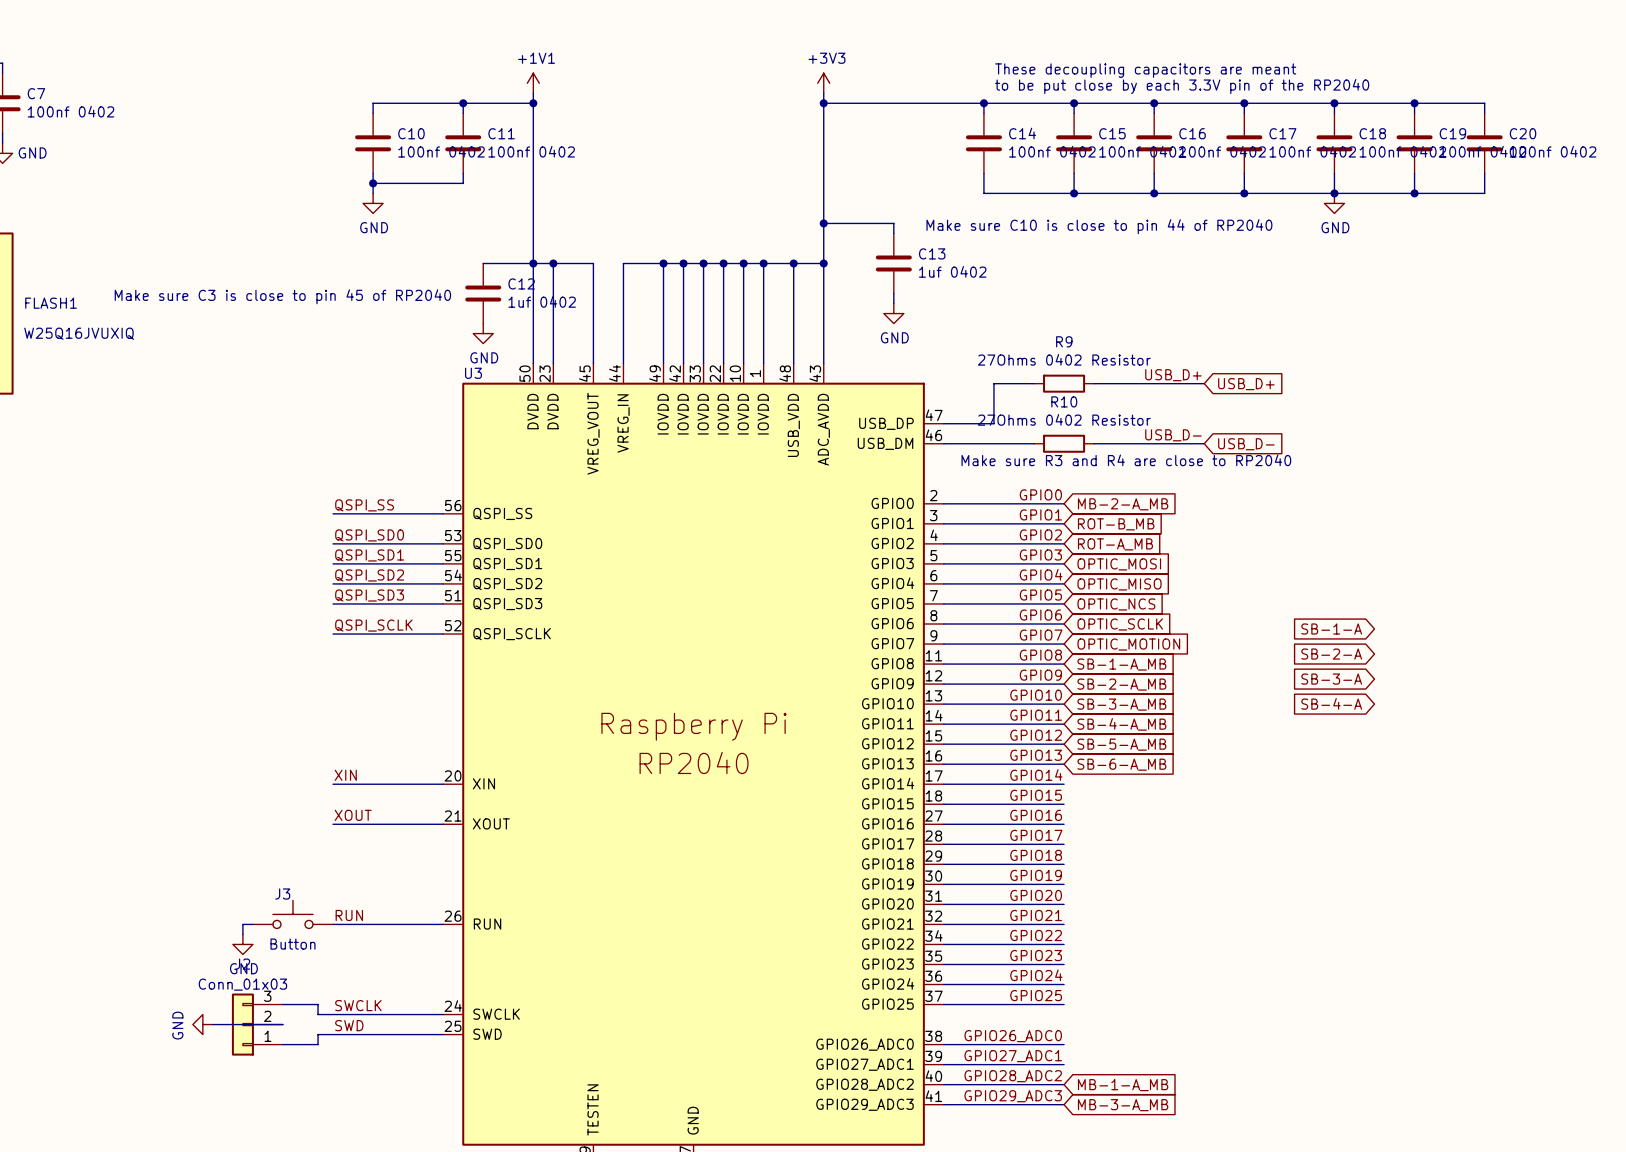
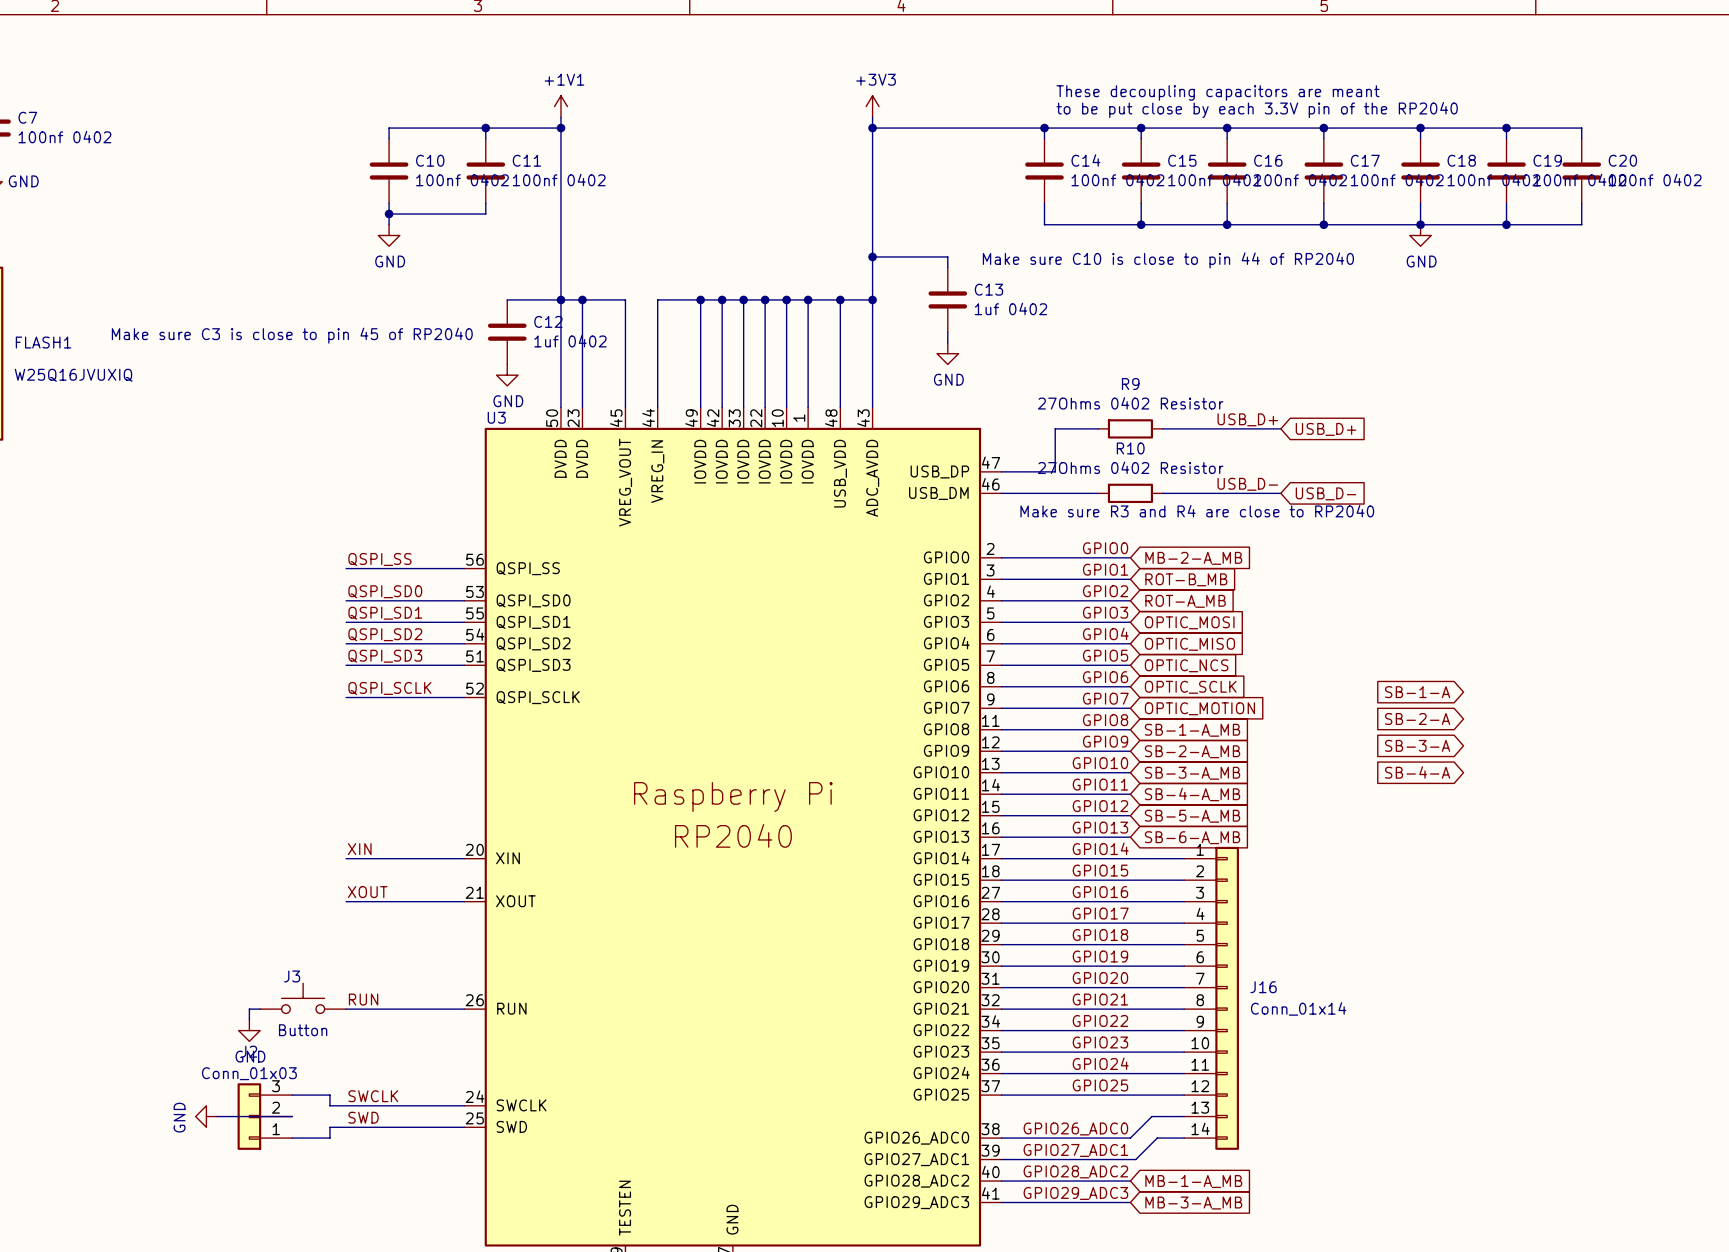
wire: none -> (1130, 858) (1184, 858)
wire: none -> (1130, 880) (1184, 880)
wire: none -> (1130, 901) (1184, 901)
wire: none -> (1130, 923) (1184, 923)
wire: none -> (1130, 944) (1184, 944)
wire: none -> (1130, 966) (1184, 966)
wire: none -> (1130, 987) (1184, 987)
J16: none -> Conn_01x14 (1211, 998)
wire: none -> (1130, 1009) (1184, 1009)
wire: none -> (1130, 1030) (1184, 1030)
wire: none -> (1130, 1052) (1184, 1052)
wire: none -> (1130, 1073) (1184, 1073)
wire: none -> (1130, 1095) (1184, 1095)
wire: none -> (1184, 1116) (1151, 1116) (1130, 1138)
wire: none -> (1184, 1138) (1157, 1138) (1135, 1159) (1130, 1159)

